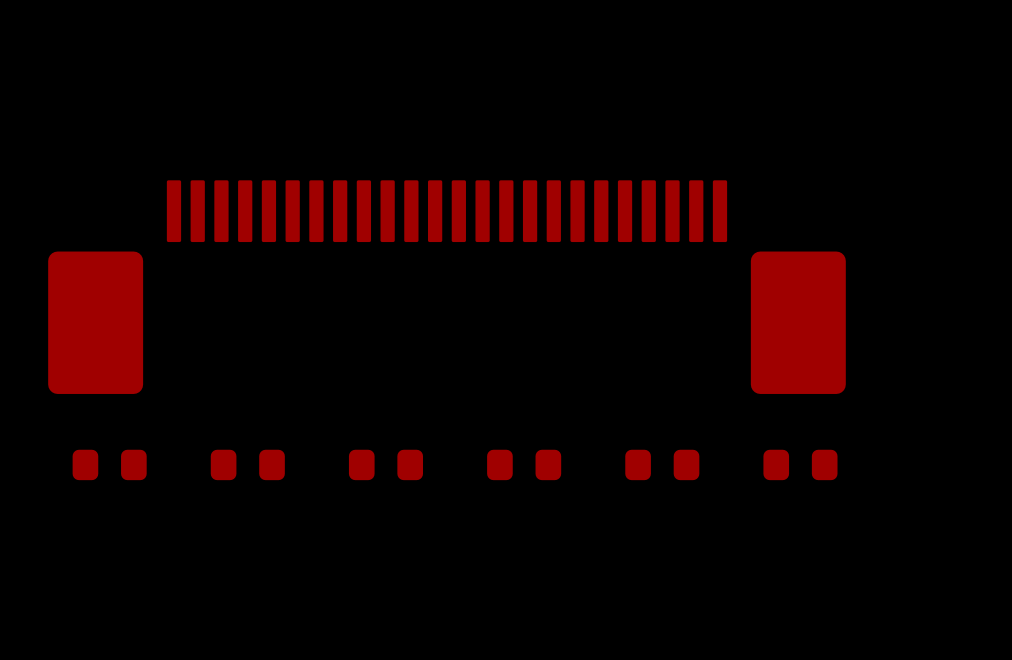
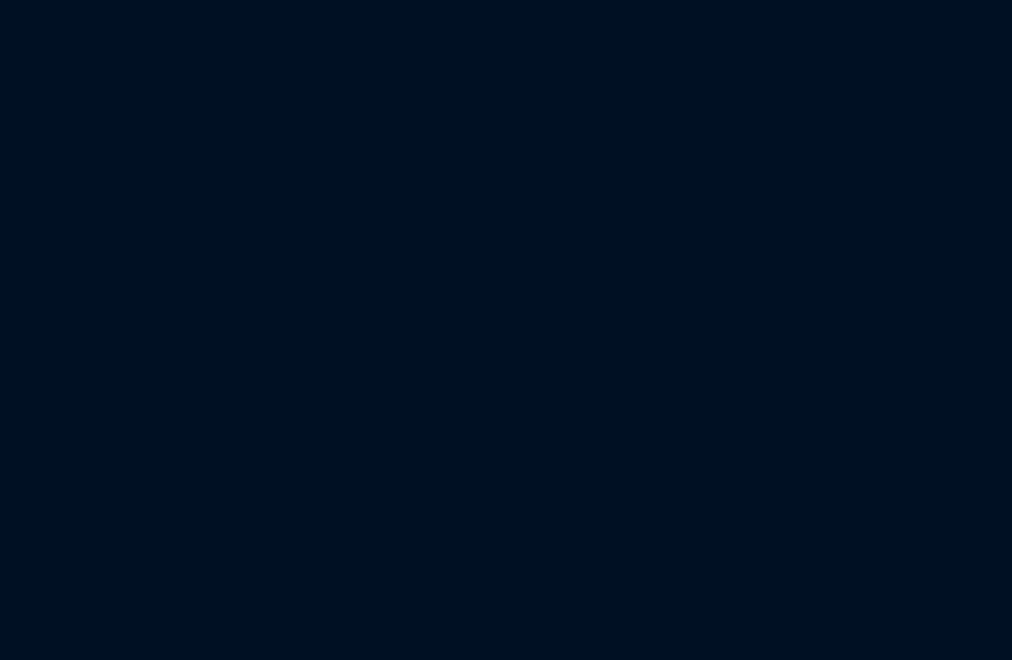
part: (446, 287) -> none
part: (109, 464) -> none
part: (247, 464) -> none
part: (385, 464) -> none
part: (524, 464) -> none
part: (662, 464) -> none
part: (800, 464) -> none

